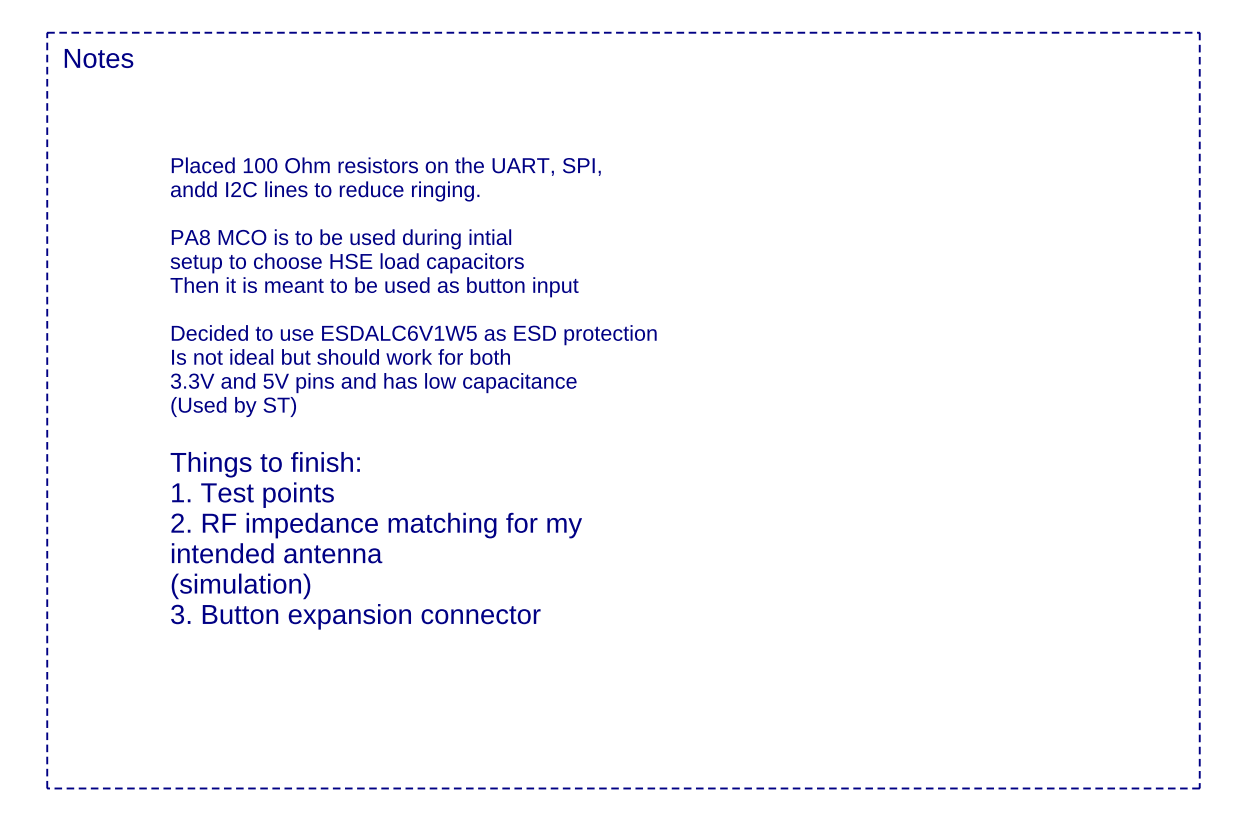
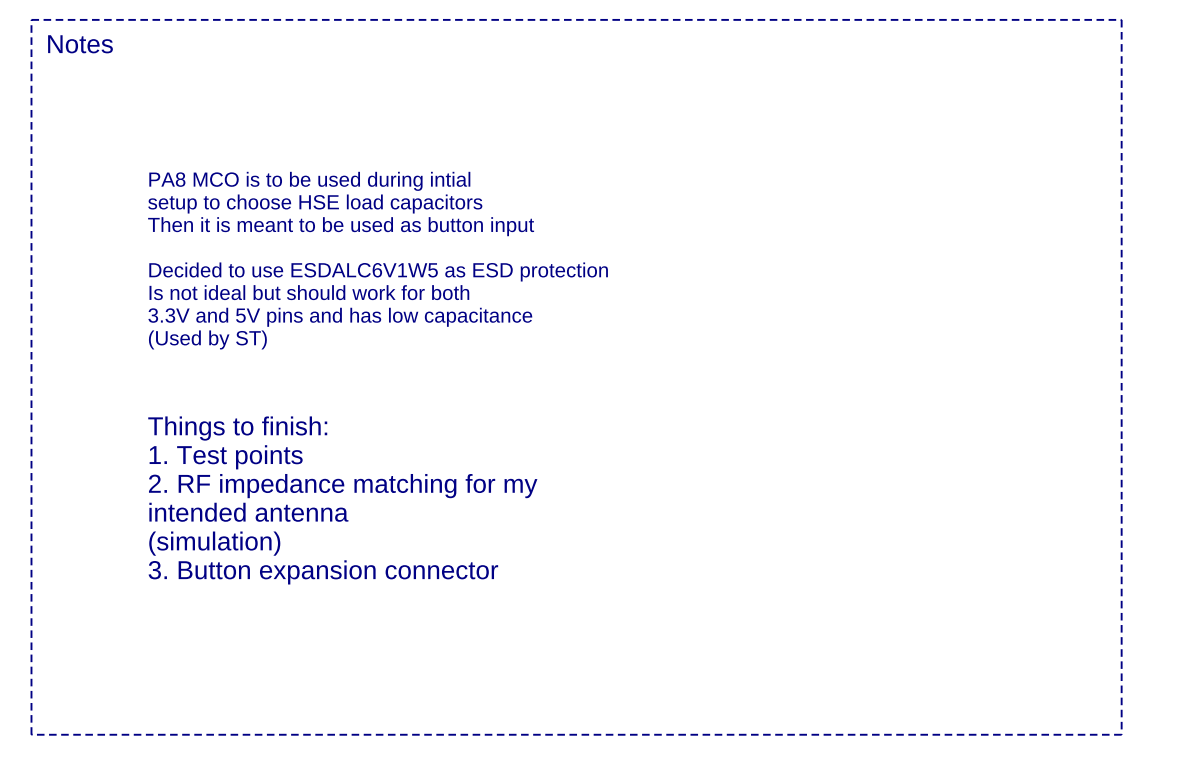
text: Placed 100 Ohm resistors on the UART, SPI, (386, 166) -> none
text: andd I2C lines to reduce ringing. (325, 191) -> none
text position: PA8 MCO is to be used during intial (341, 239) -> PA8 MCO is to be used during intial (309, 181)
text position: setup to choose HSE load capacitors (347, 263) -> setup to choose HSE load capacitors (315, 204)
text position: Then it is meant to be used as button input (374, 287) -> Then it is meant to be used as button input (341, 226)
text position: Decided to use ESDALC6V1W5 as ESD protection (414, 335) -> Decided to use ESDALC6V1W5 as ESD protection (378, 271)
text position: Is not ideal but should work for both (341, 356) -> Is not ideal but should work for both (309, 292)
text position: 3.3V and 5V pins and has low capacitance (373, 383) -> 3.3V and 5V pins and has low capacitance (340, 317)
text position: (Used by ST) (233, 407) -> (Used by ST) (207, 339)

